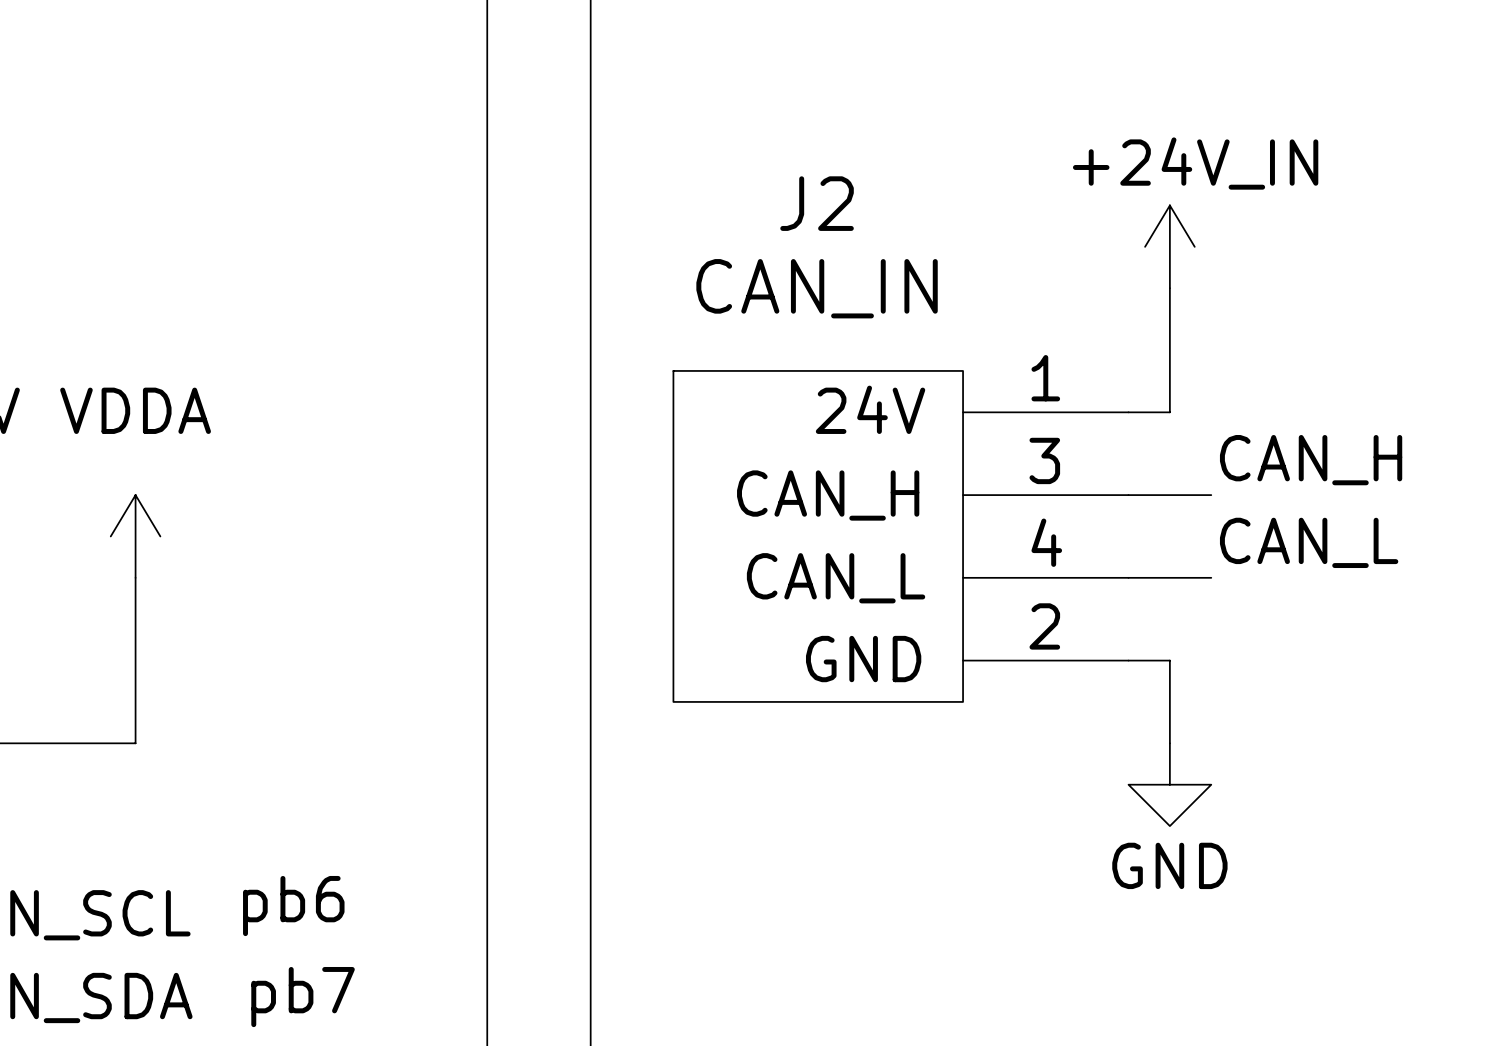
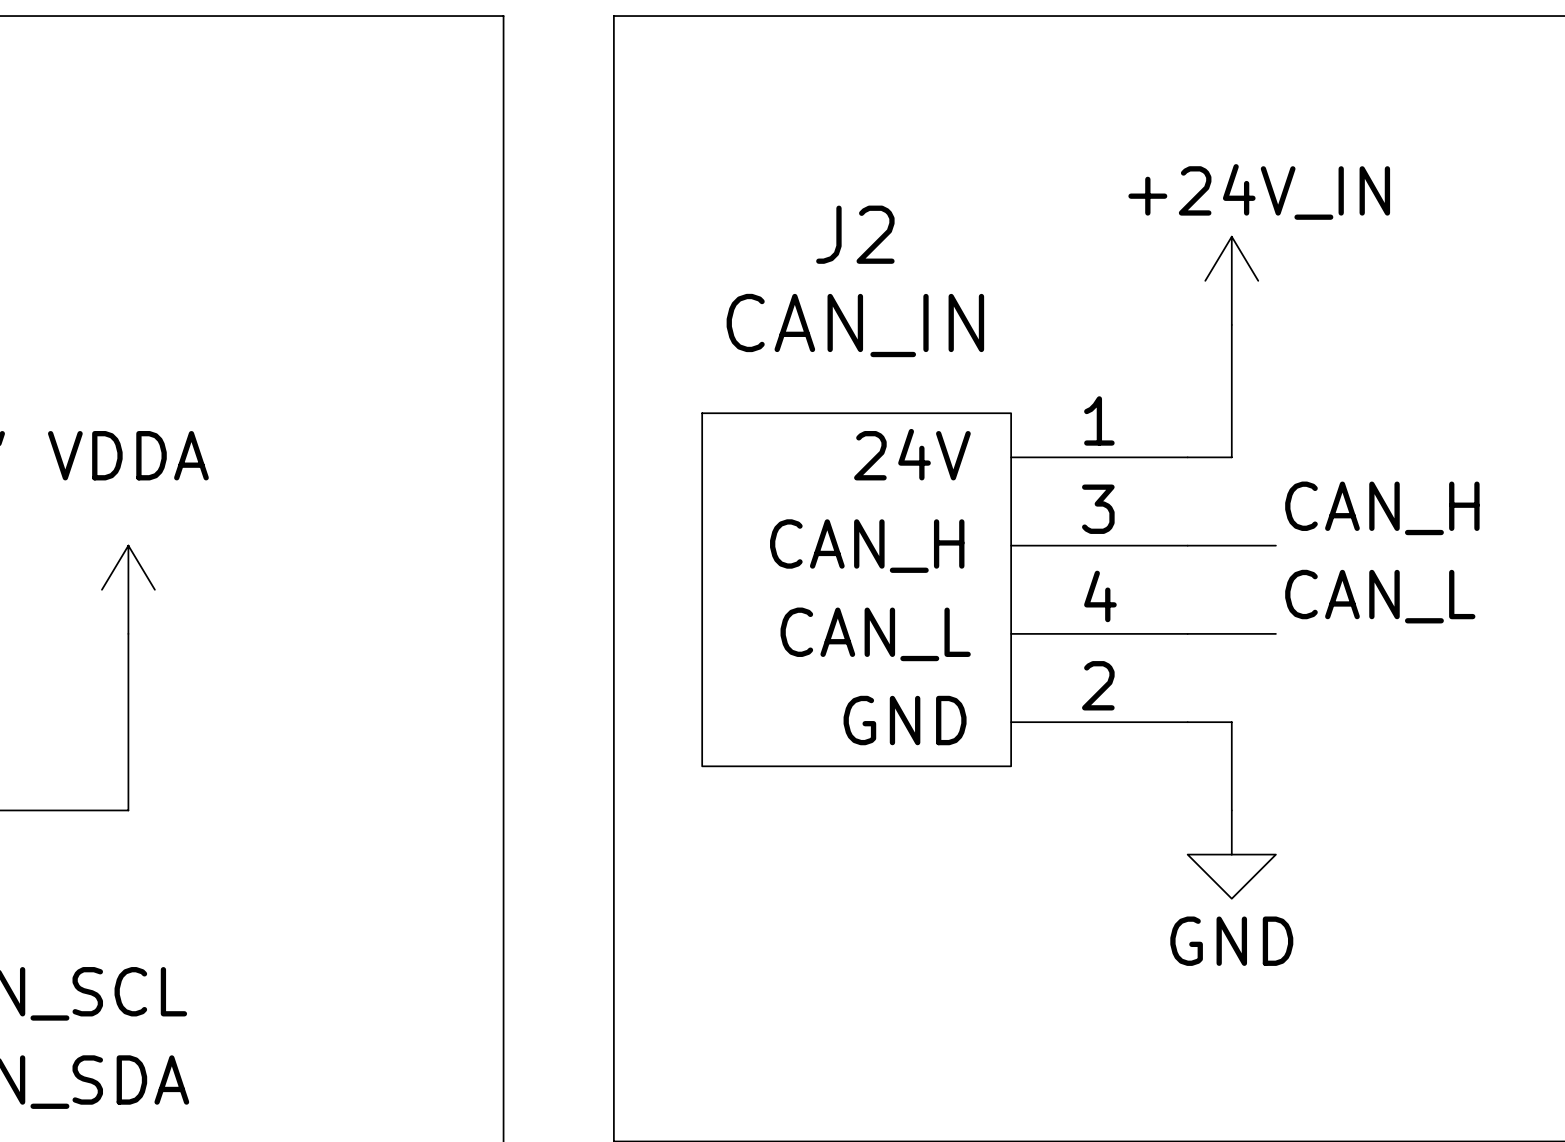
text: pb6 (293, 906) -> none
text: pb7 (303, 997) -> none

